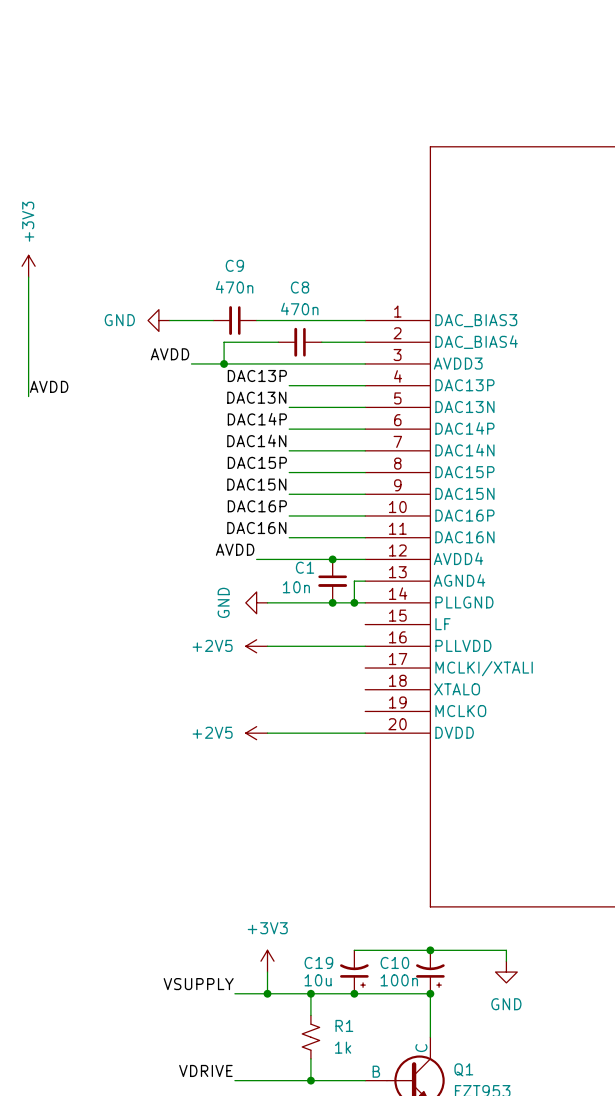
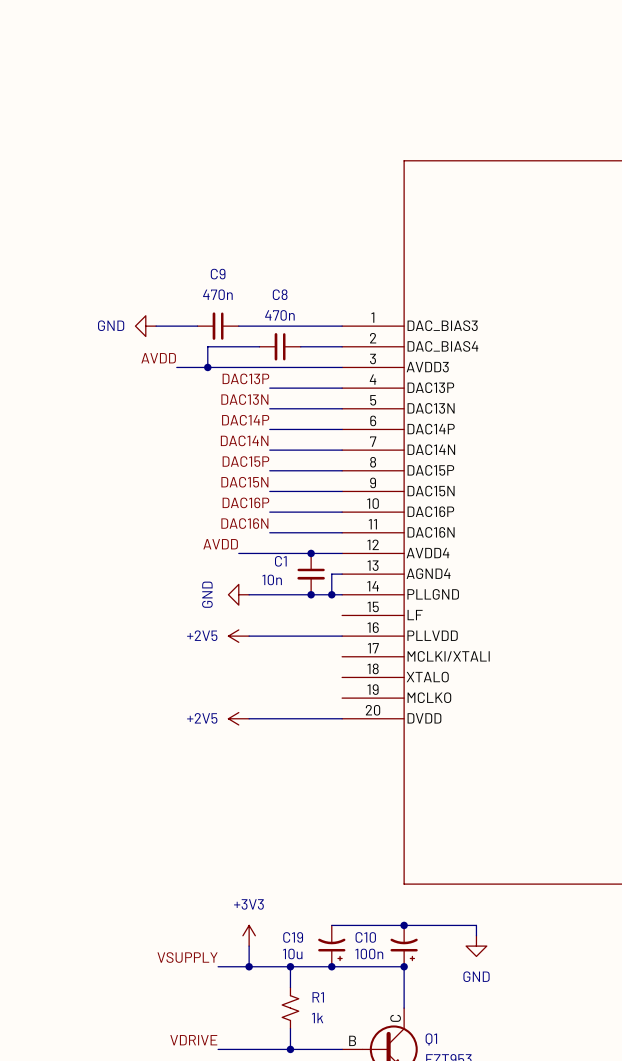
power symbol: +3V3 (28, 266) -> none
wire: (28, 277) (28, 396) -> none
label: AVDD (49, 386) -> none

